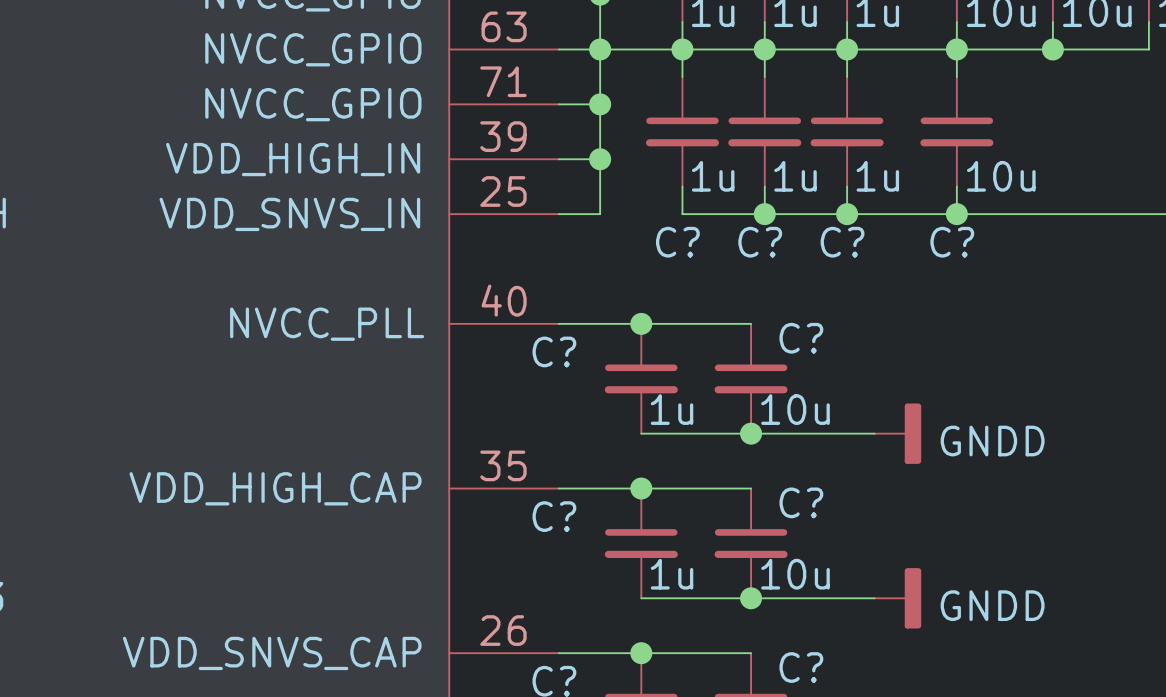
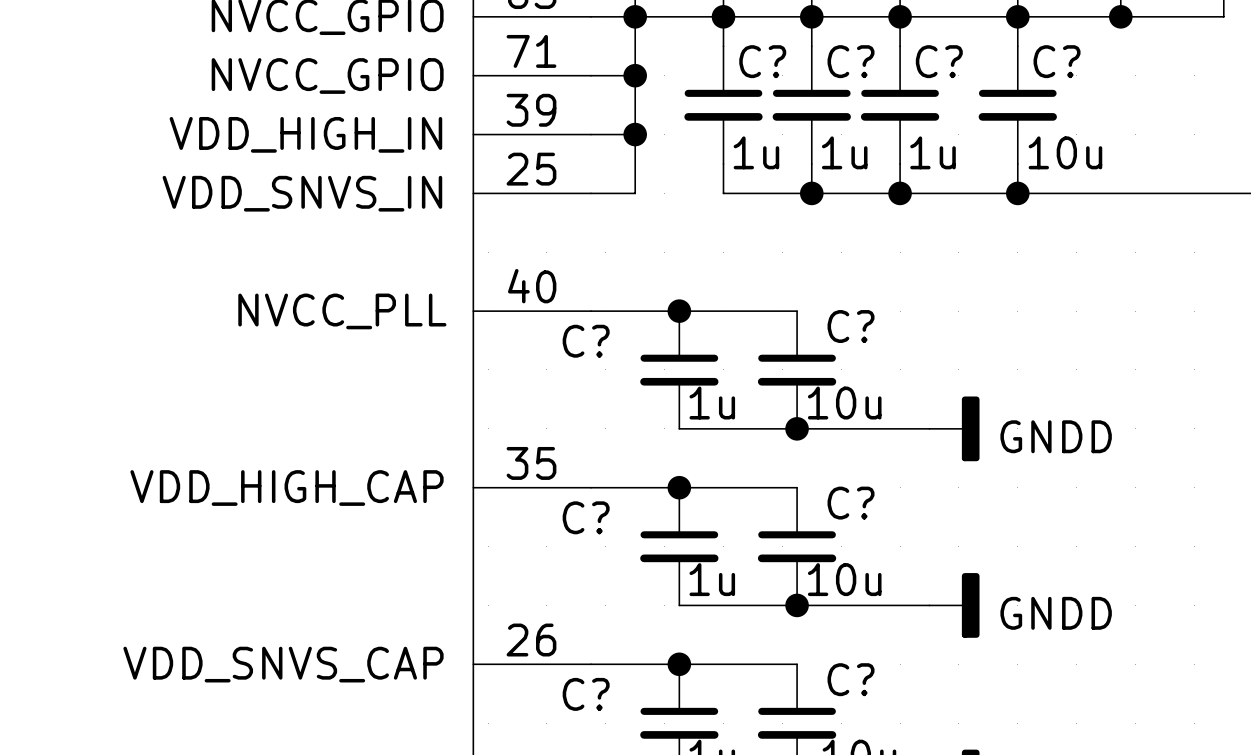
C? name position: C? (677, 242) -> C? (762, 61)
C? name position: C? (760, 242) -> C? (851, 61)
C? name position: C? (842, 242) -> C? (939, 61)
C? name position: C? (952, 242) -> C? (1057, 61)

